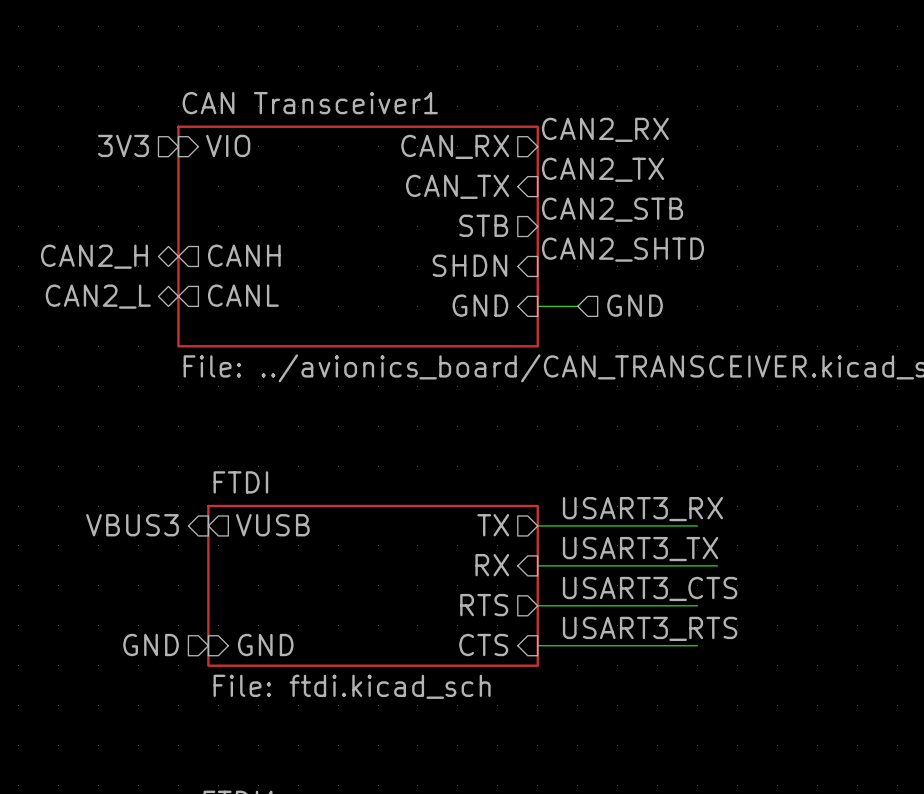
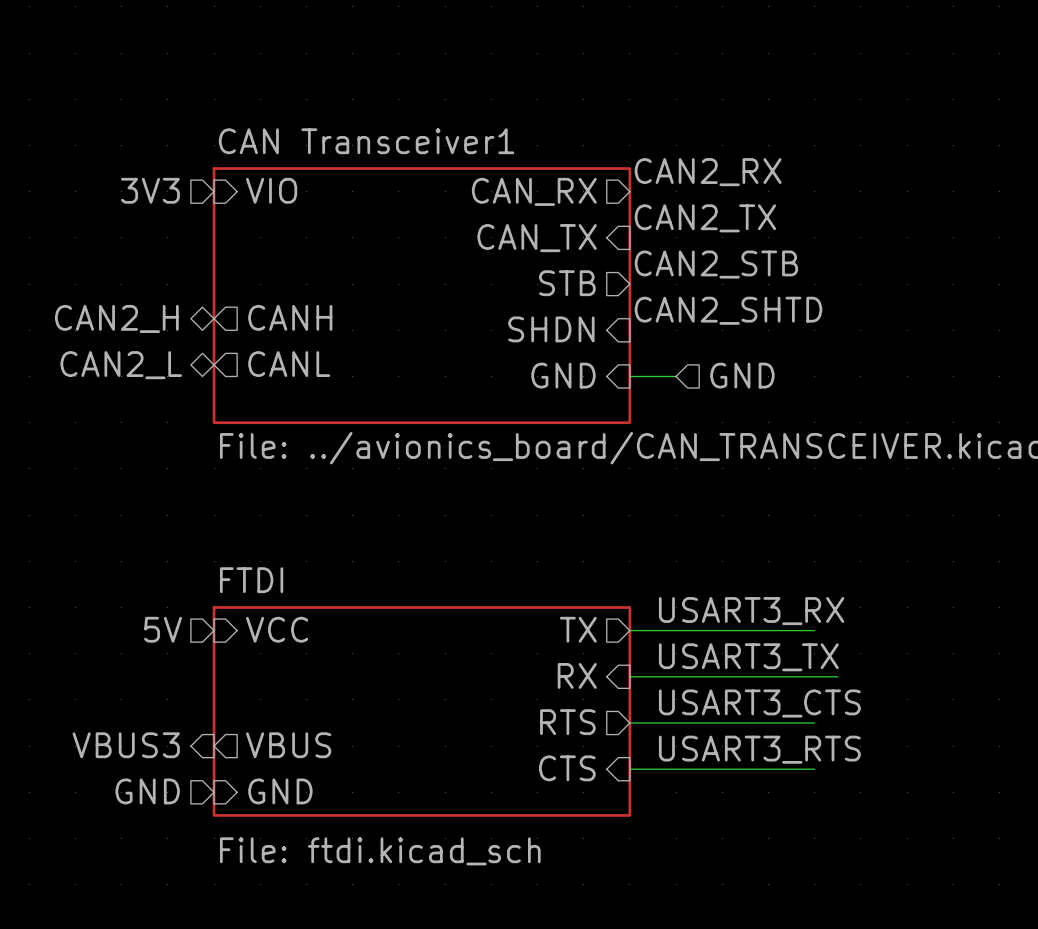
hierarchical label position: VBUS3 (132, 525) -> VBUS3 (126, 745)
hierarchical label: none -> 5V (163, 629)
sheet pin: none -> VCC (277, 629)
sheet pin: VUSB (272, 525) -> none
sheet FTDI: File: ftdi.kicad_sch (373, 585) -> none
sheet FTDI: none -> File: ftdi.kicad_sch (421, 711)
sheet pin: none -> VBUS (288, 745)
hierarchical label position: GND (151, 645) -> GND (147, 791)
sheet pin position: GND (265, 645) -> GND (280, 791)

